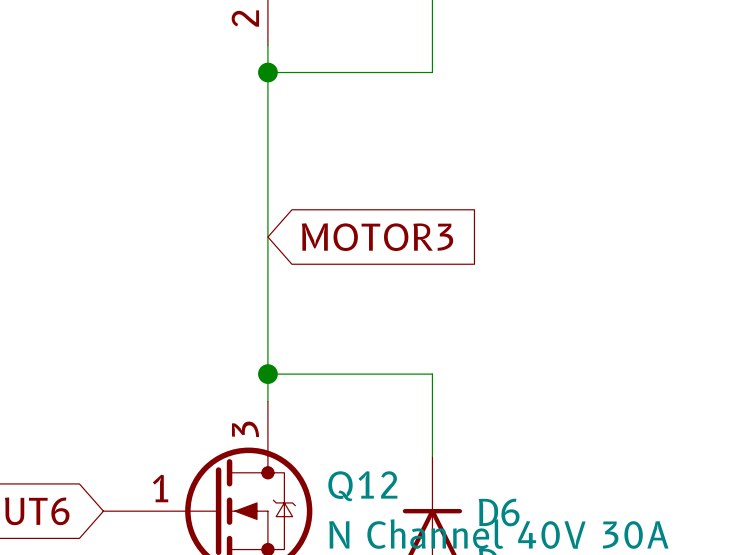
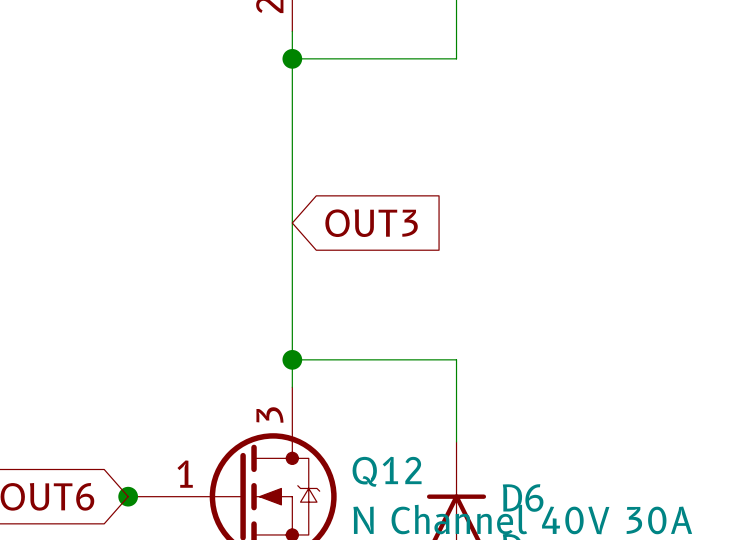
global label: MOTOR3 (377, 237) -> OUT3 (371, 223)
junction: none -> (128, 496)

